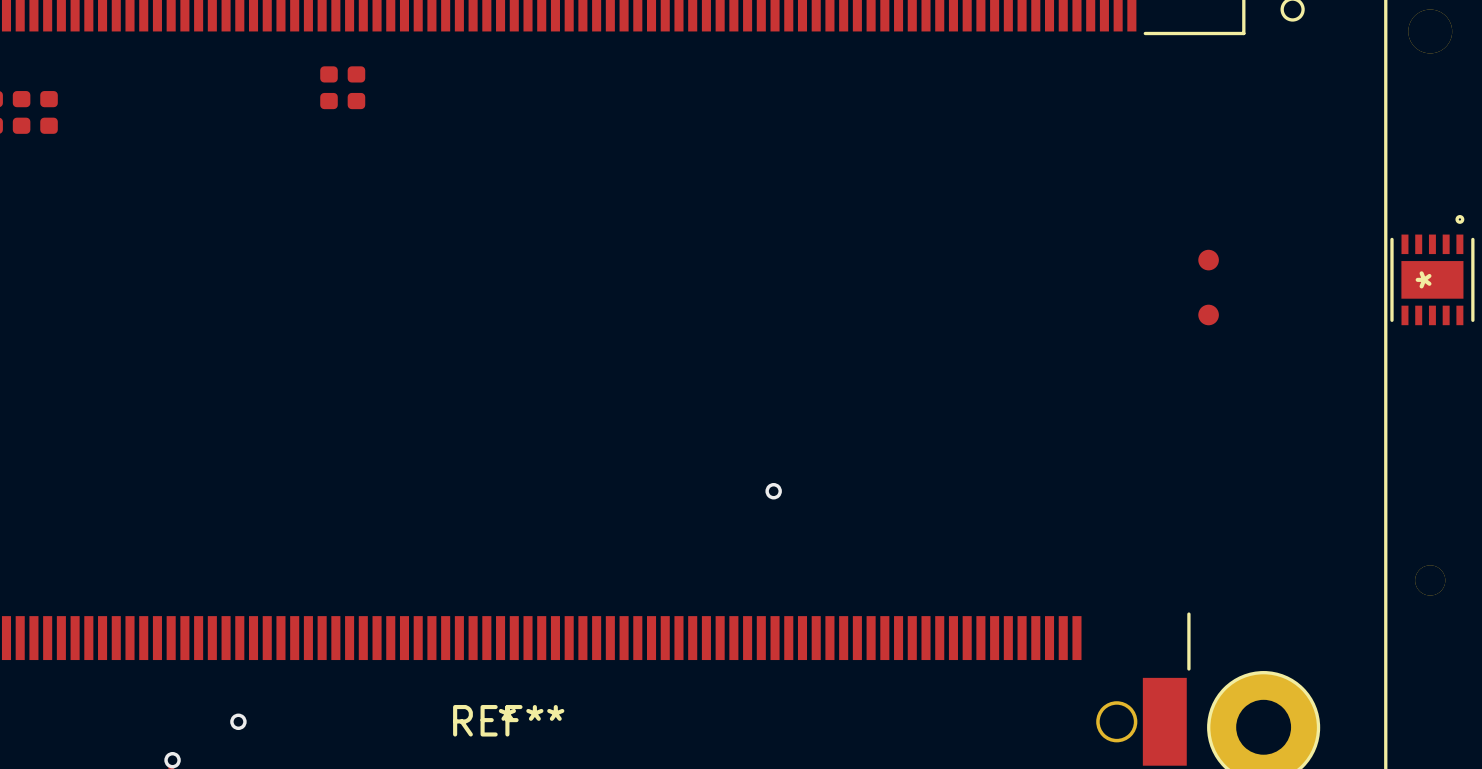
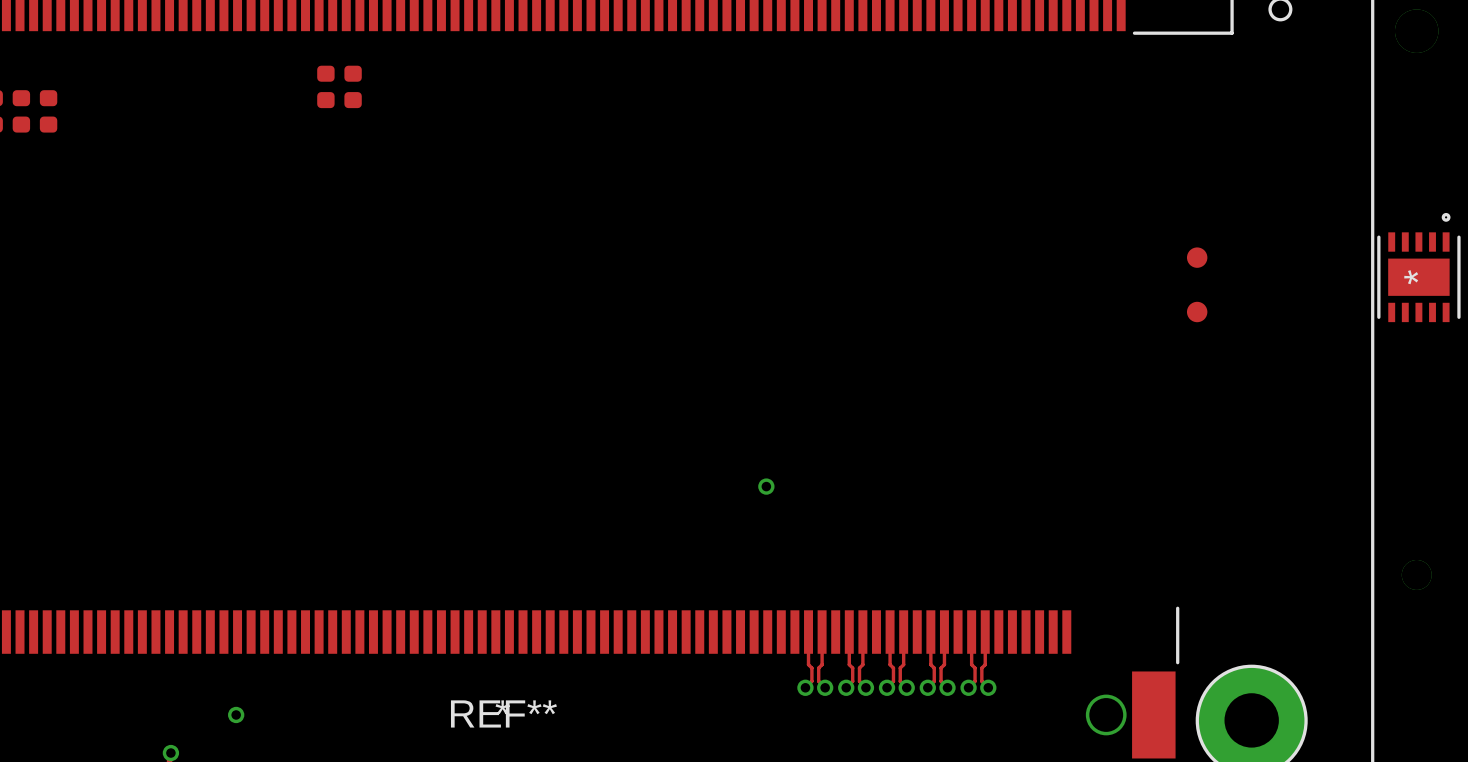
track: none -> (808, 632) (808, 664) (811, 668) (811, 681) (805, 687)
track: none -> (822, 632) (822, 664) (818, 668) (818, 681) (825, 687)
track: none -> (849, 632) (849, 664) (852, 668) (852, 681) (846, 687)
track: none -> (862, 632) (862, 664) (859, 668) (859, 681) (865, 687)
track: none -> (890, 632) (890, 664) (893, 668) (893, 681) (887, 687)
track: none -> (903, 632) (903, 664) (900, 668) (900, 681) (906, 687)
track: none -> (930, 632) (930, 664) (934, 668) (934, 681) (927, 687)
track: none -> (944, 632) (944, 664) (941, 668) (941, 681) (947, 687)
track: none -> (971, 632) (971, 664) (975, 668) (975, 681) (968, 687)
track: none -> (985, 632) (985, 664) (981, 668) (981, 681) (988, 687)
via: none -> (805, 687)
via: none -> (825, 687)
via: none -> (846, 687)
via: none -> (865, 687)
via: none -> (887, 687)
via: none -> (906, 687)
via: none -> (927, 687)
via: none -> (947, 687)
via: none -> (968, 687)
via: none -> (988, 687)

